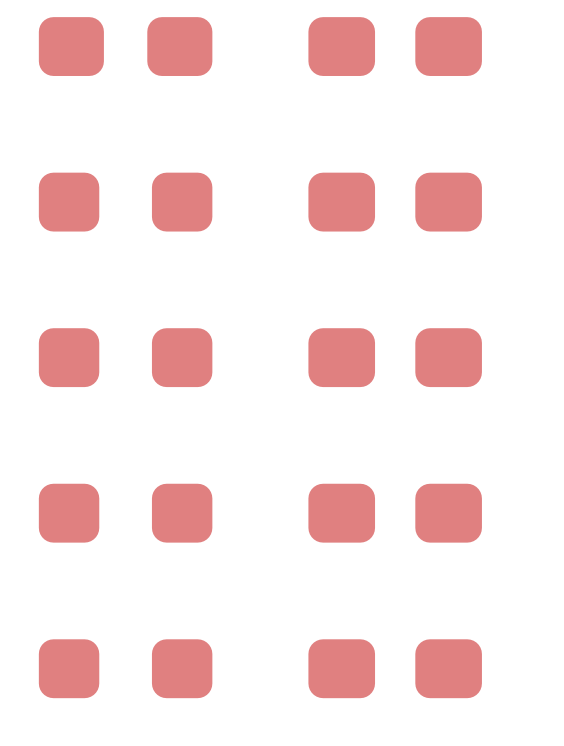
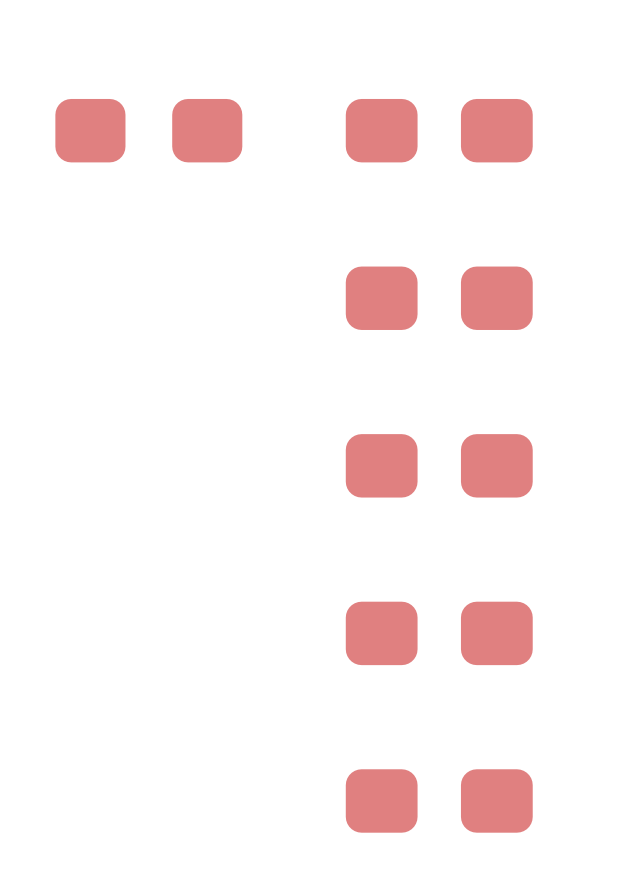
part: (125, 202) -> none
part: (125, 357) -> none
part: (125, 513) -> none
part: (125, 668) -> none

